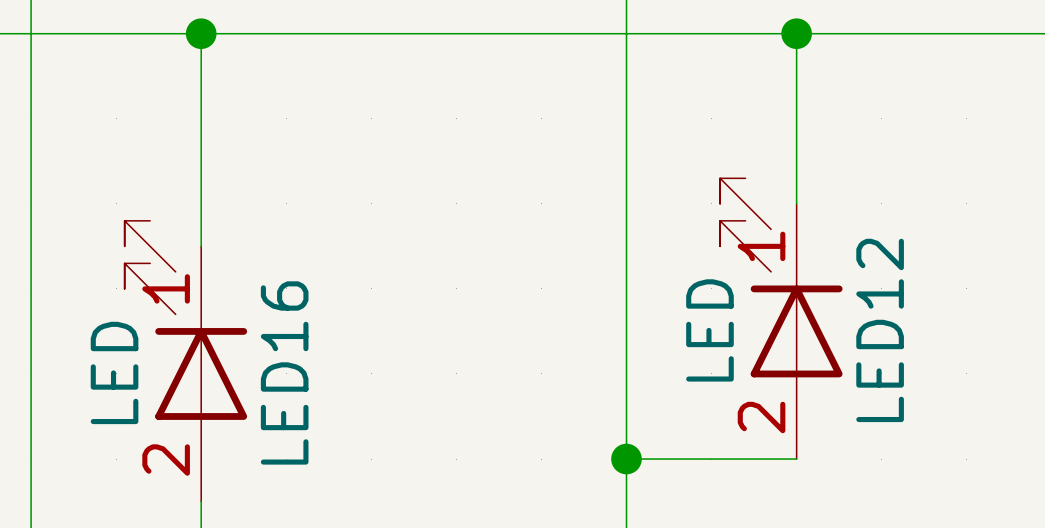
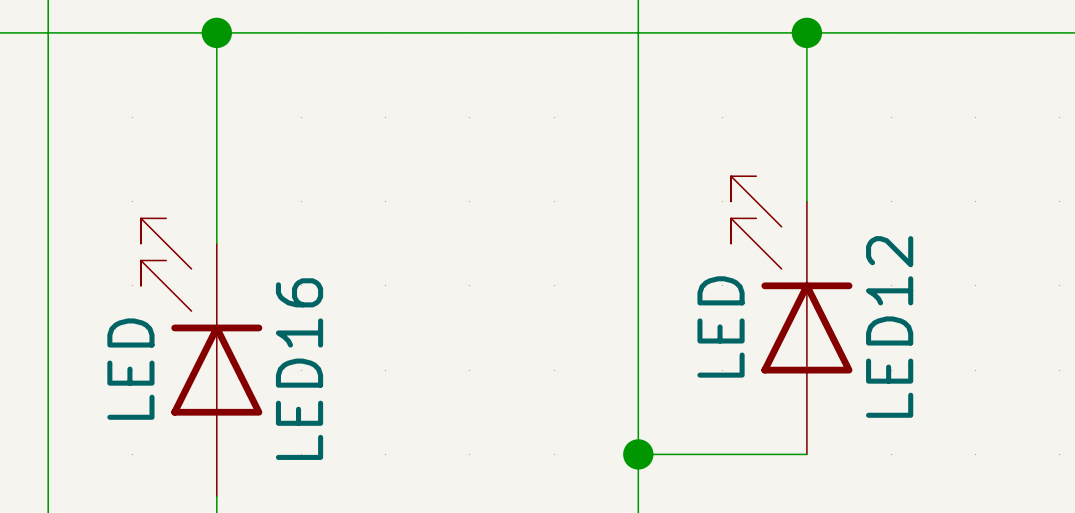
LED12 pin number: 1 (761, 246) -> none
LED16 pin number: 1 (166, 288) -> none
LED12 pin number: 2 (761, 417) -> none
LED16 pin number: 2 (166, 460) -> none

